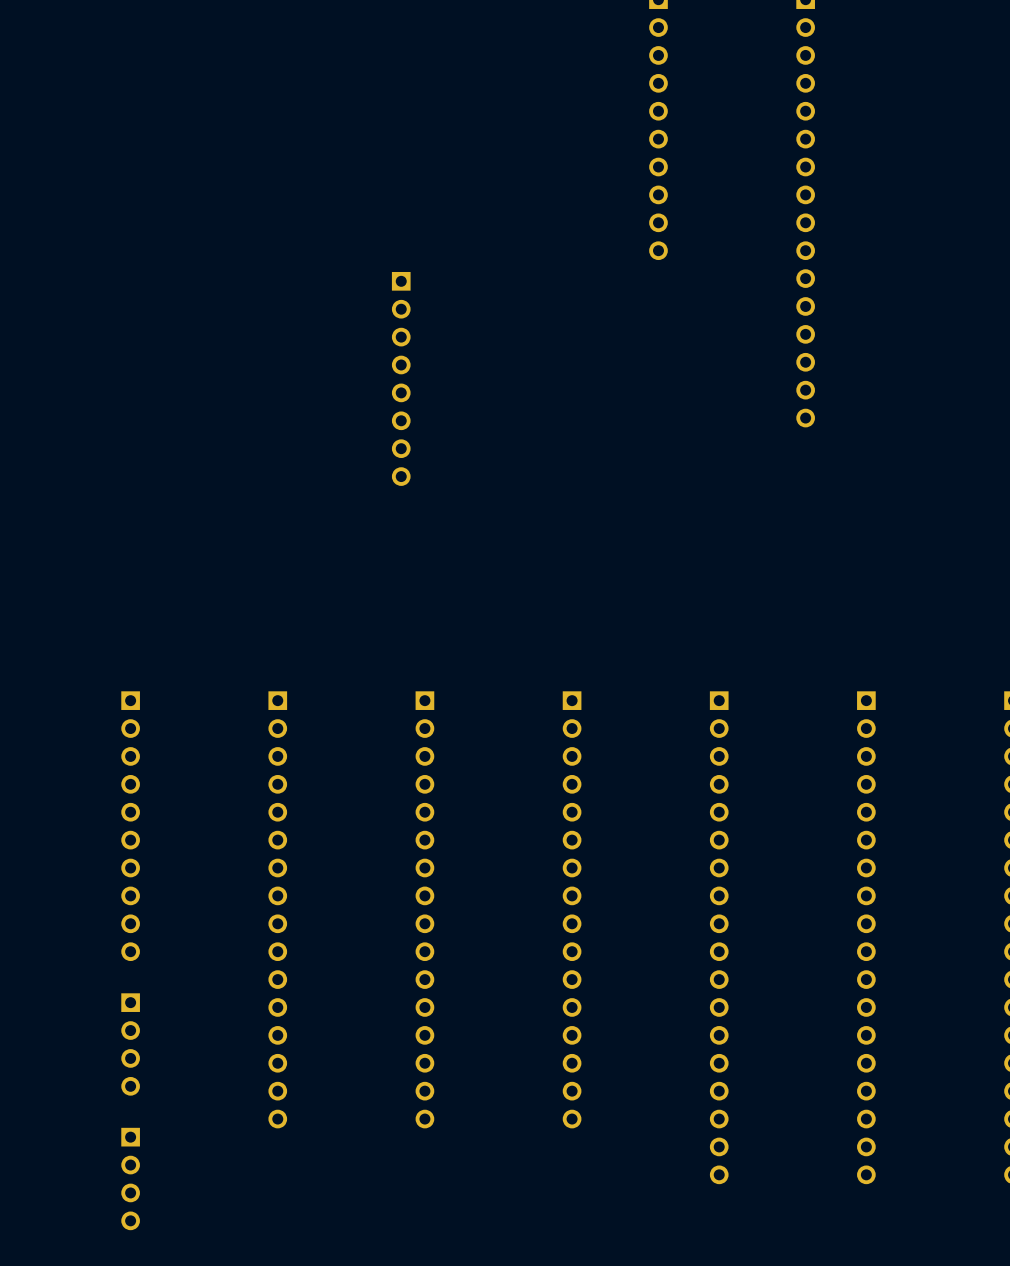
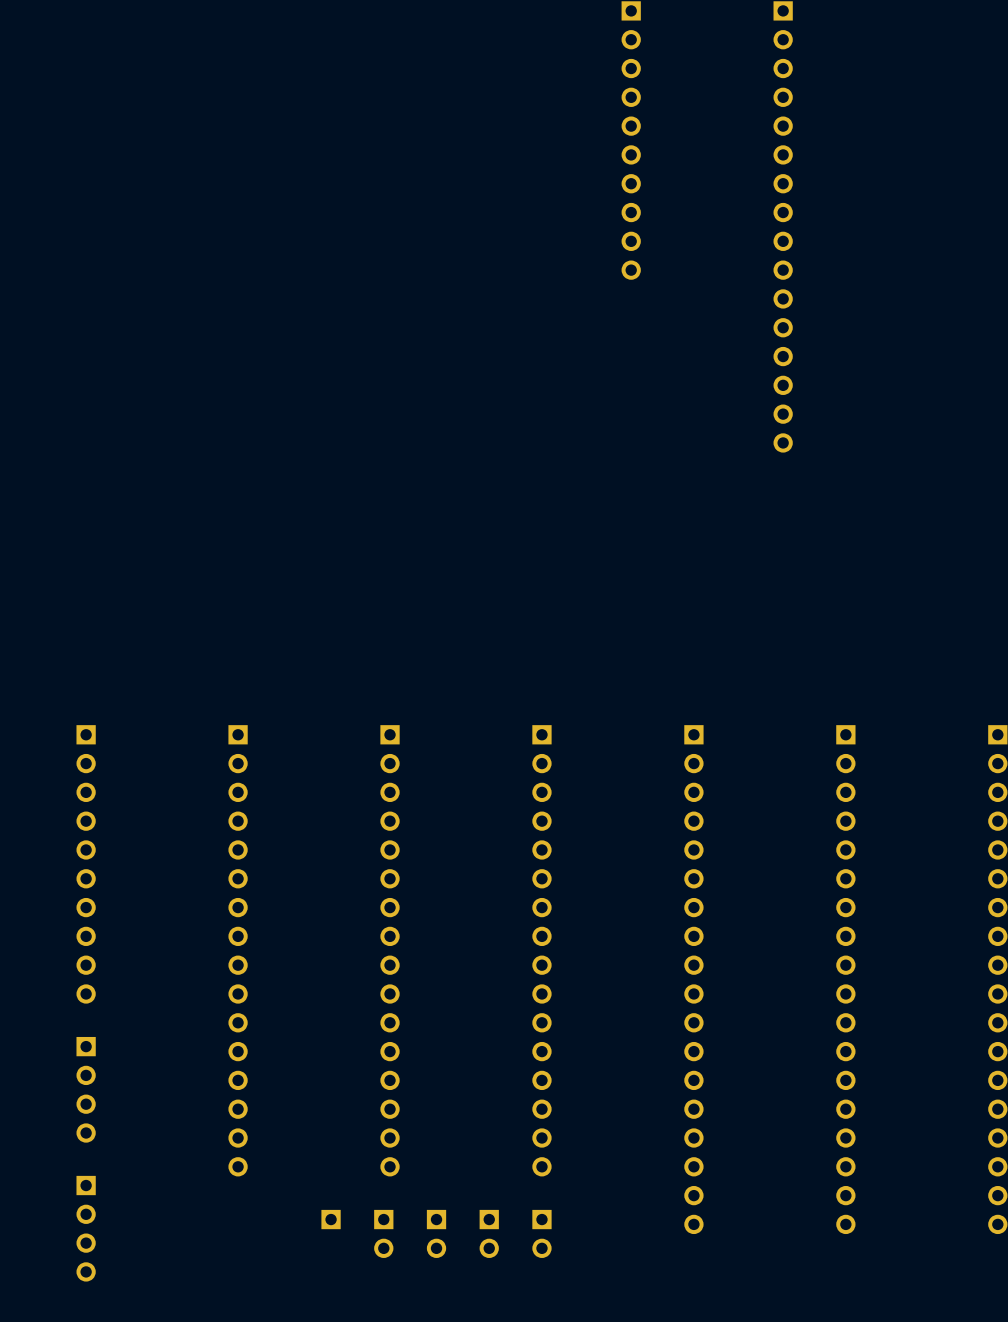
part: (401, 378) -> none
part: none -> (331, 1219)
part: none -> (383, 1233)
part: none -> (436, 1233)
part: none -> (489, 1233)
part: none -> (541, 1233)

